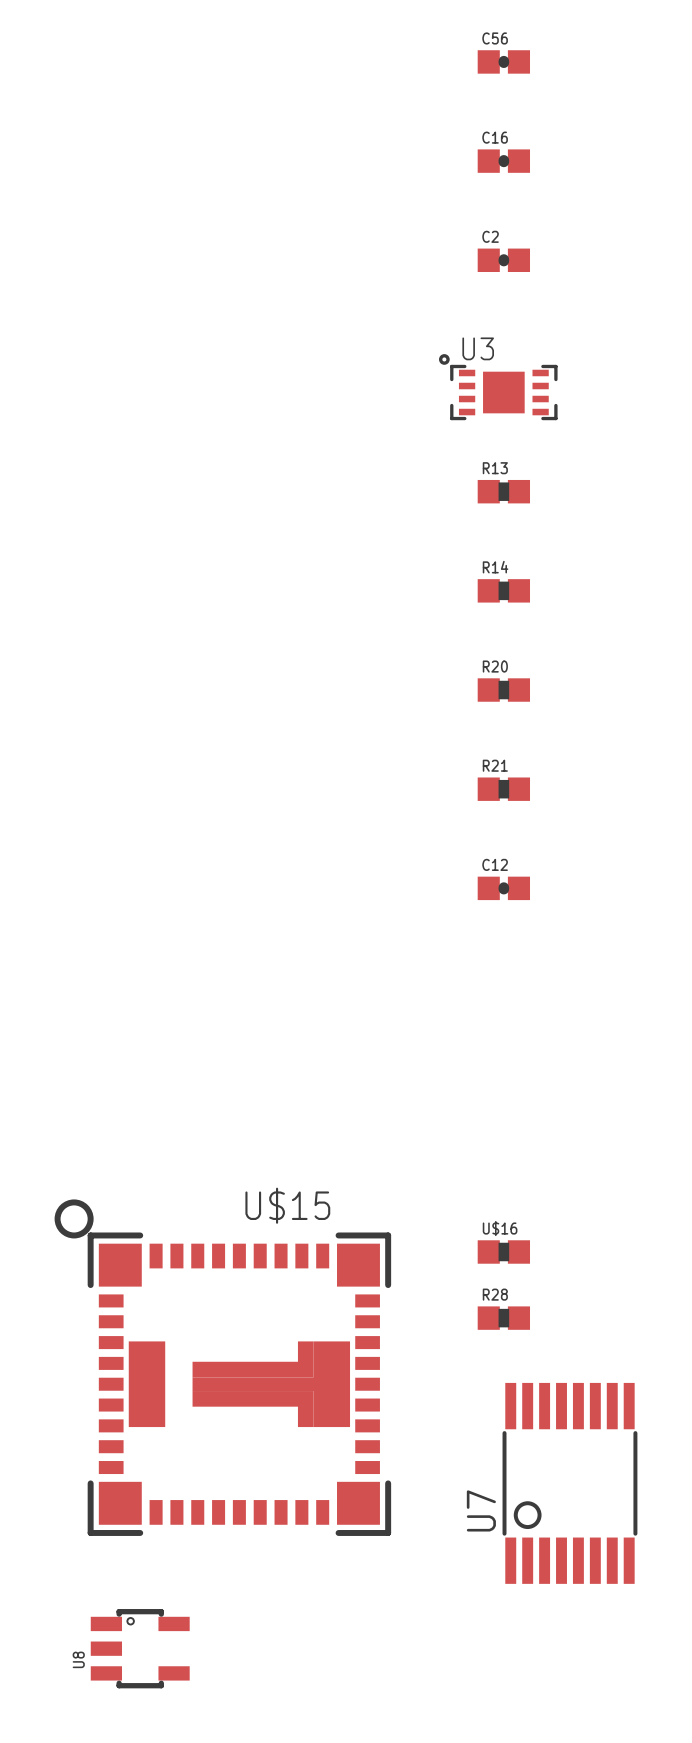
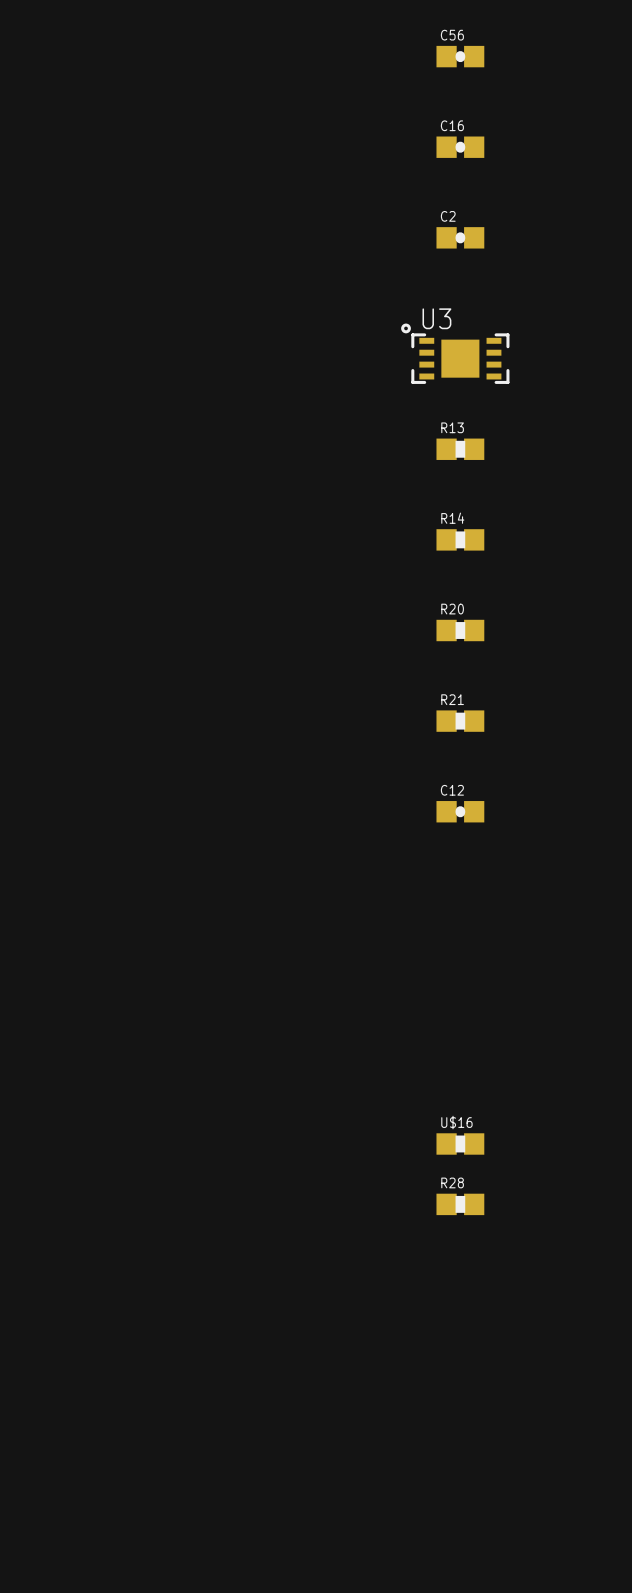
U$15: (222, 1367) -> none
U7: (569, 1483) -> none
U8: (140, 1648) -> none

